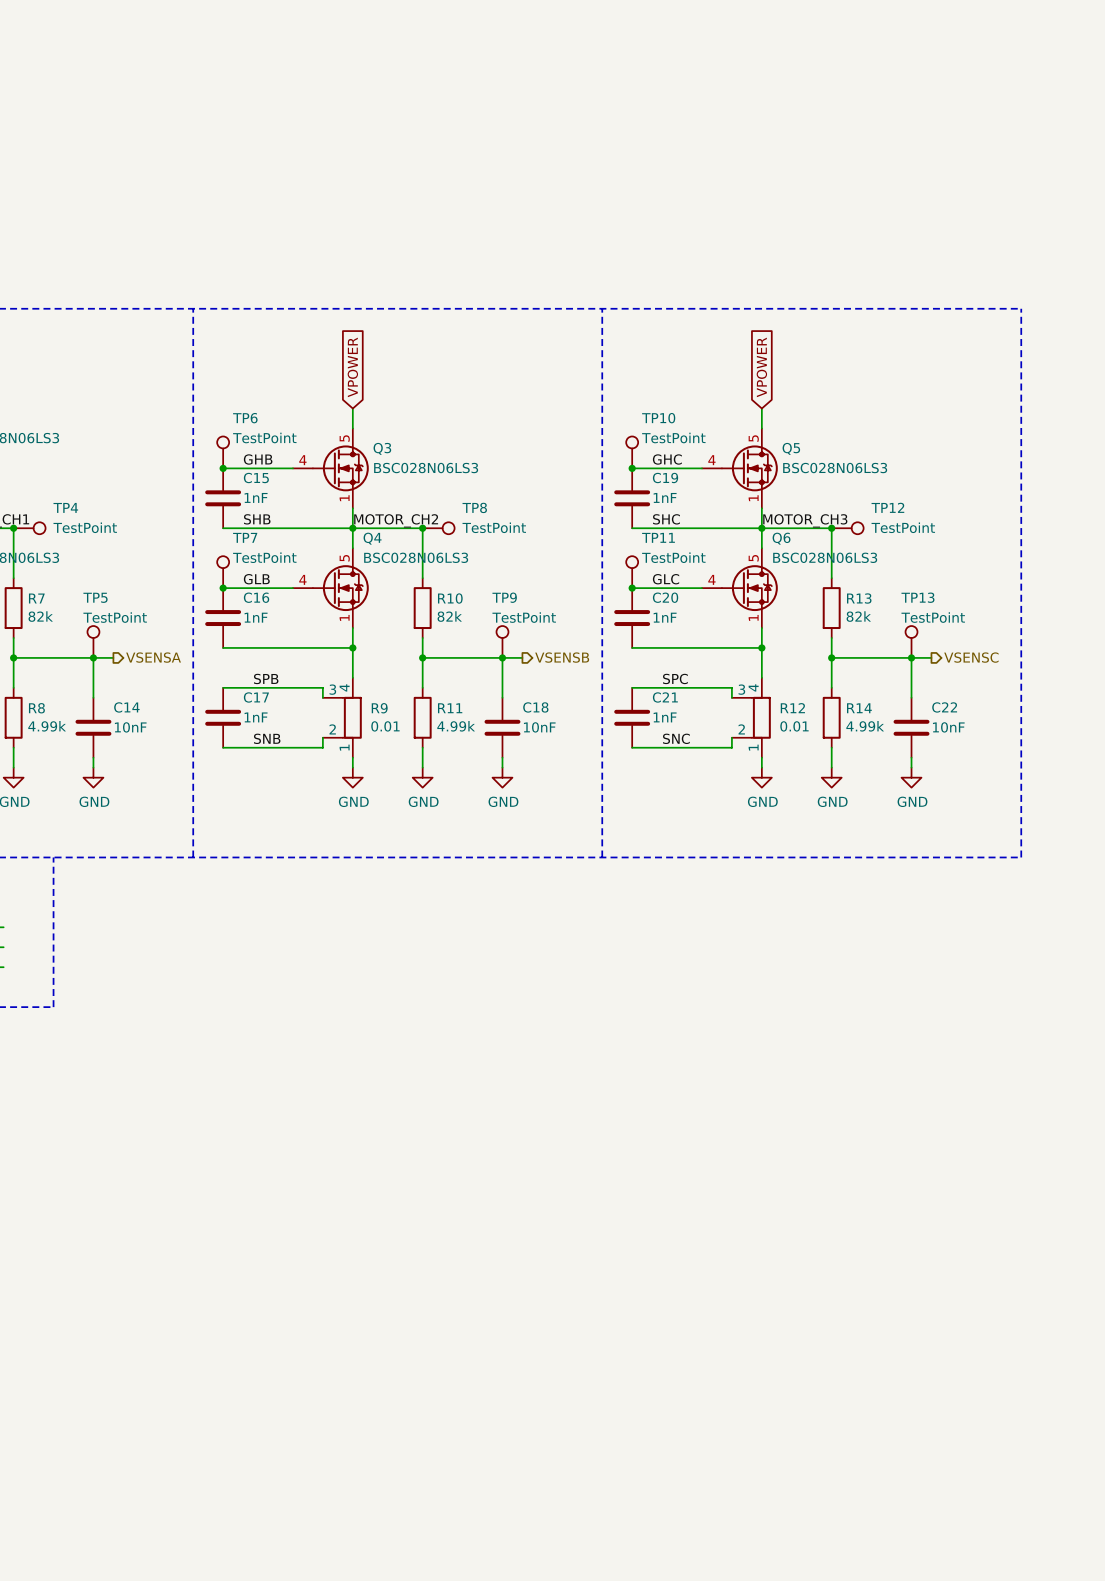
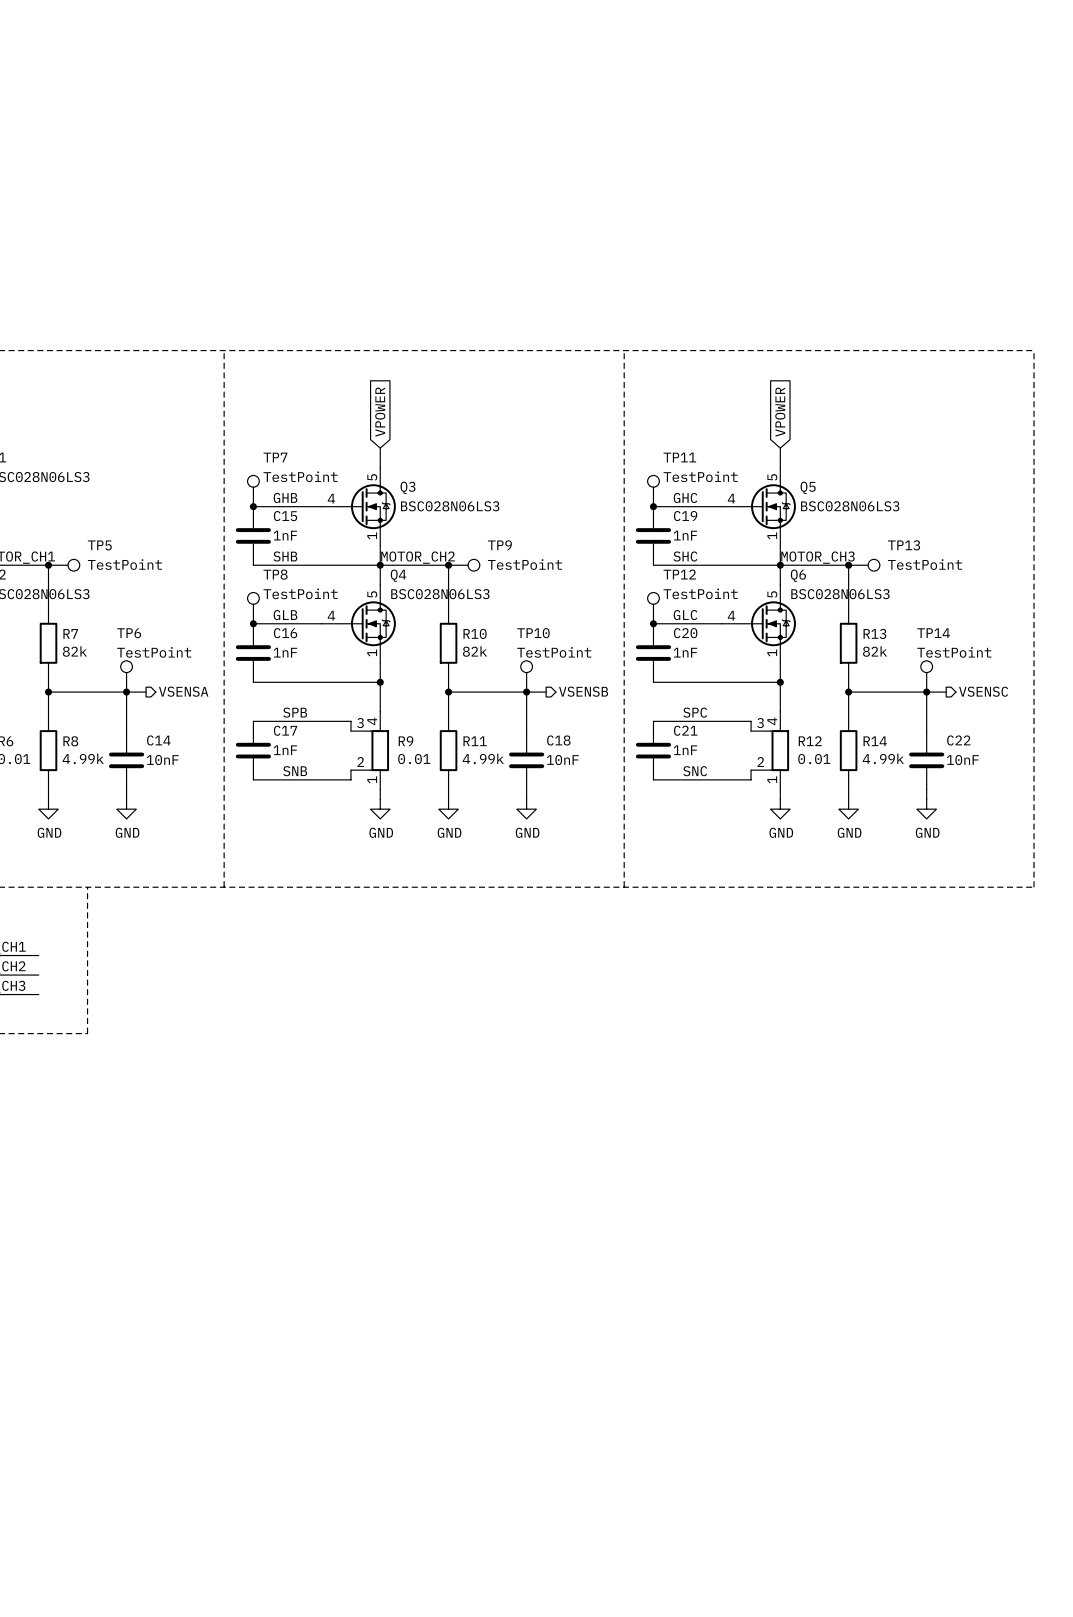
TP6 name: TP6 (245, 418) -> TP7 (275, 457)
TP10 name: TP10 (658, 418) -> TP11 (679, 457)
TP4 name: TP4 (65, 507) -> TP5 (99, 545)
TP8 name: TP8 (474, 507) -> TP9 (499, 545)
TP12 name: TP12 (887, 507) -> TP13 (904, 545)
TP7 name: TP7 (245, 537) -> TP8 (275, 574)
TP11 name: TP11 (658, 537) -> TP12 (679, 574)
TP5 name: TP5 (95, 597) -> TP6 (129, 633)
TP9 name: TP9 (504, 597) -> TP10 (533, 633)
TP13 name: TP13 (917, 597) -> TP14 (933, 633)

